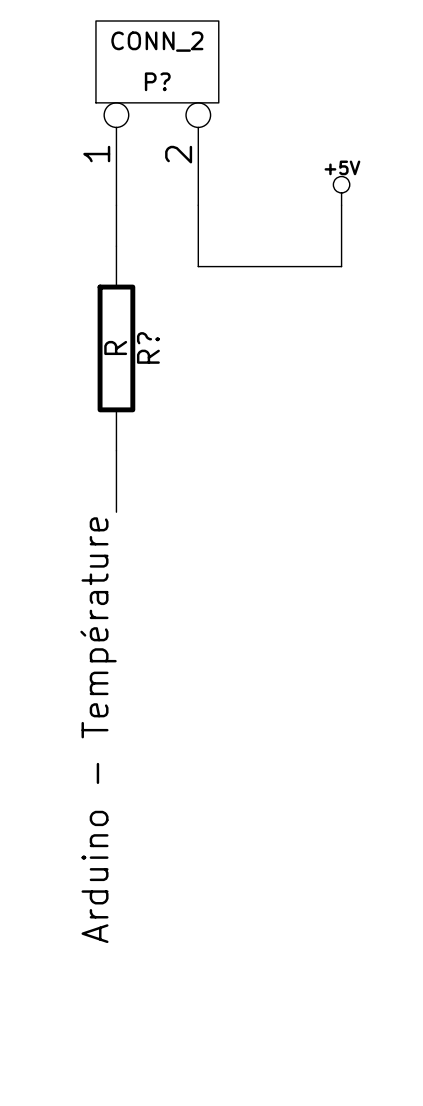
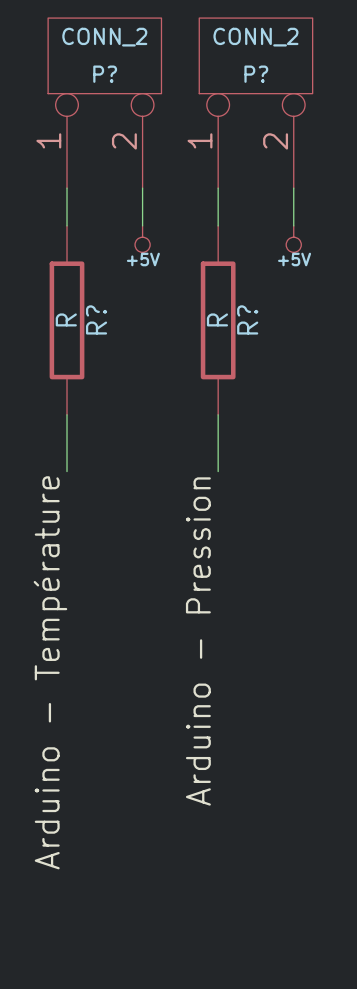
P?: none -> CONN_2 (255, 103)
power symbol rotation: 0° (341, 190) -> 180° (293, 239)
power symbol position: +5V (341, 190) -> +5V (293, 239)
wire: none -> (218, 188) (218, 225)
wire: (341, 205) (341, 266) (198, 266) (198, 246) -> none
wire: none -> (293, 188) (293, 225)
power symbol: none -> +5V (142, 239)
R?: none -> R (218, 320)
wire: none -> (218, 414) (218, 471)
label: none -> Arduino - Pression (198, 641)

